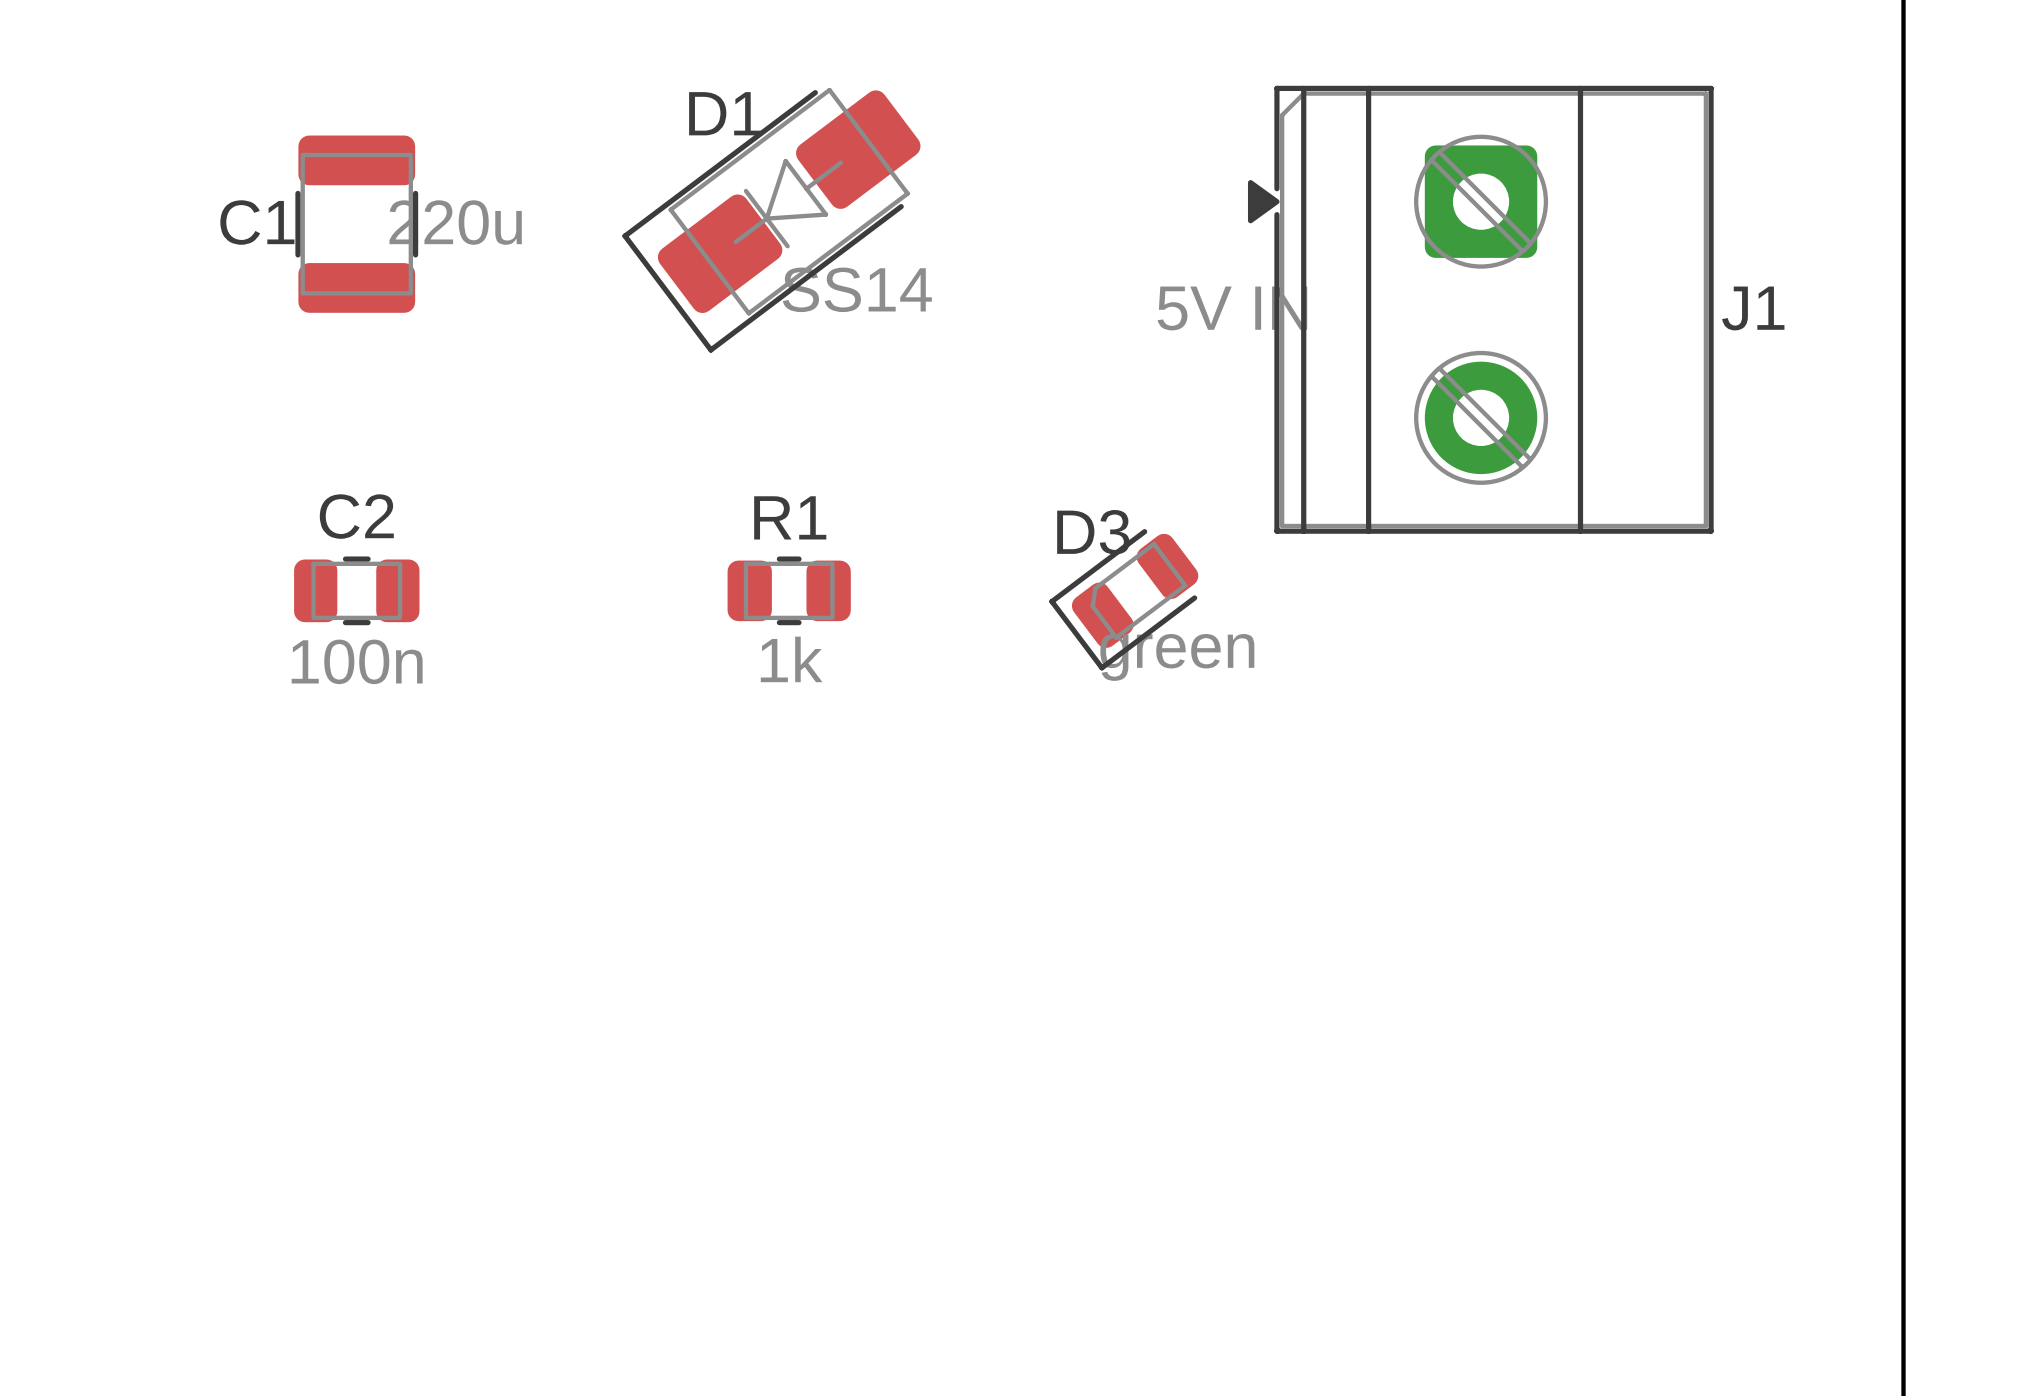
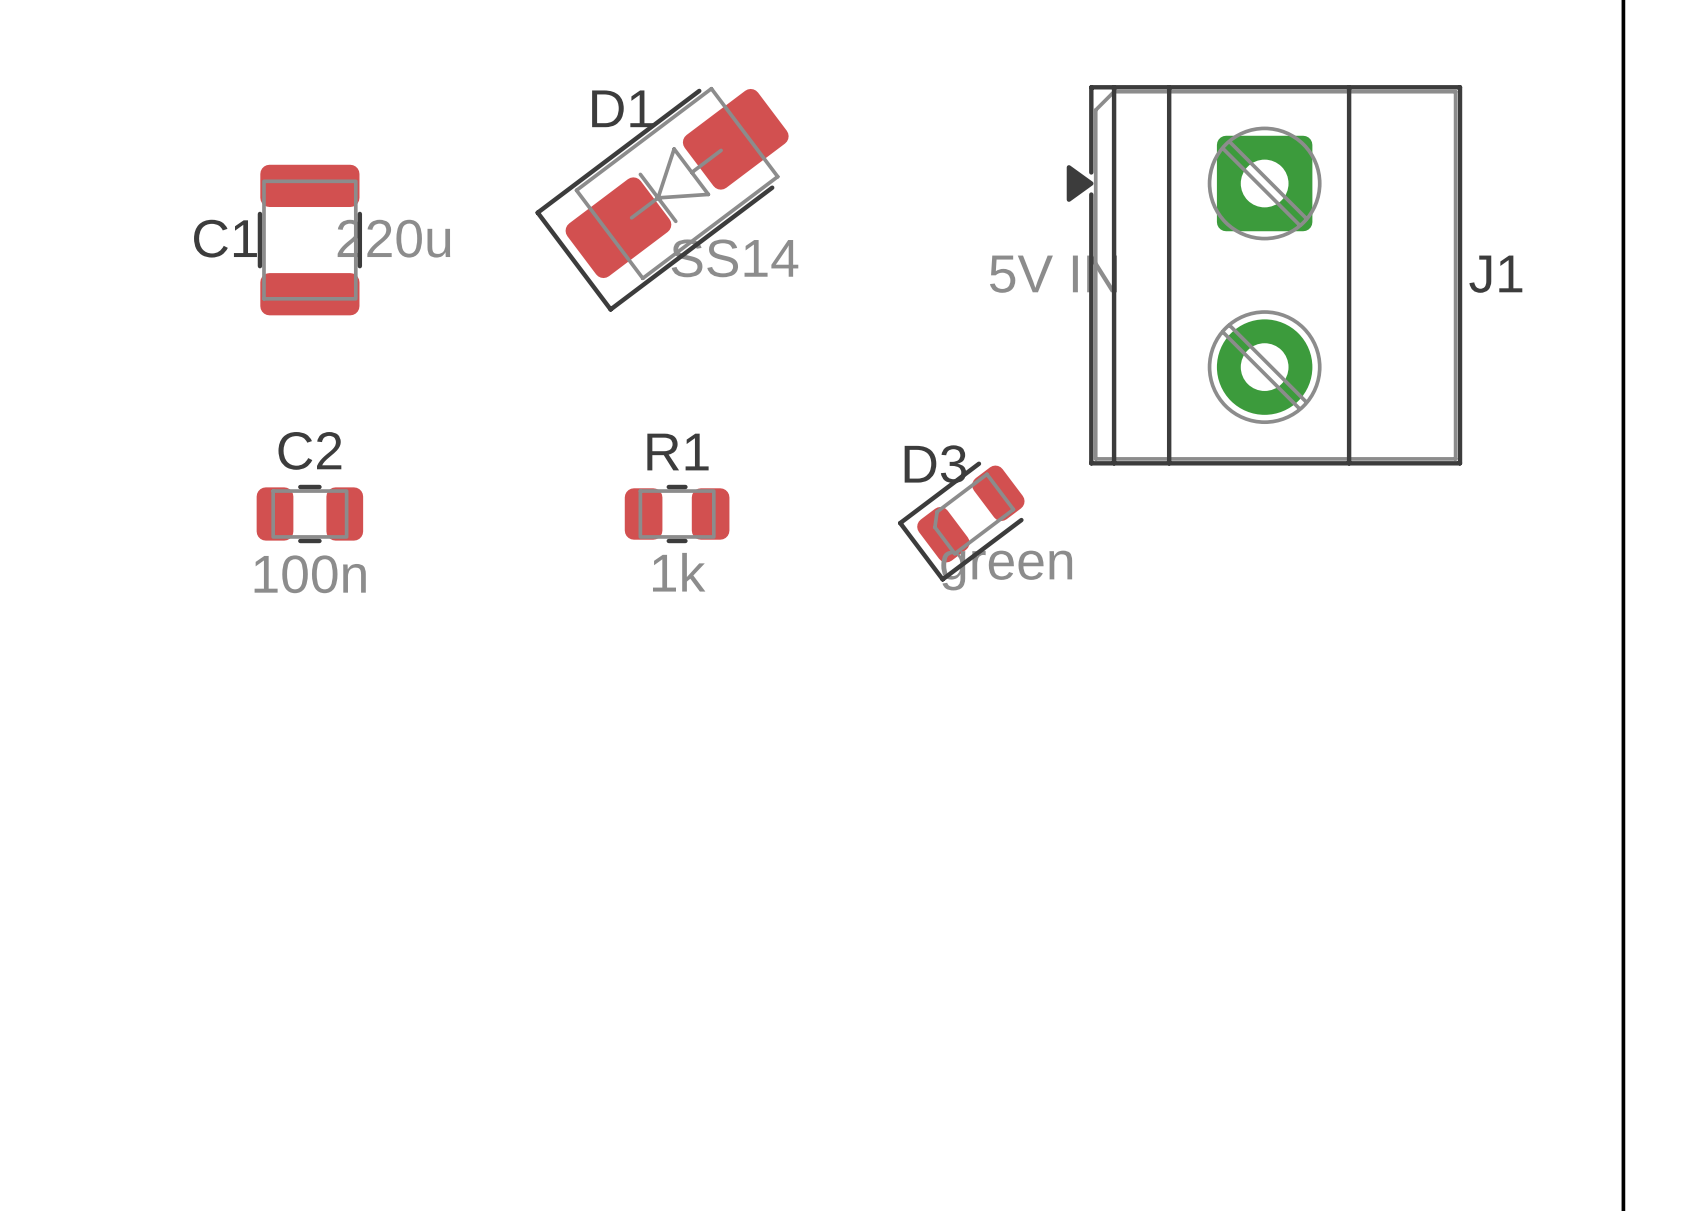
C1 position: (356, 224) -> (309, 240)

